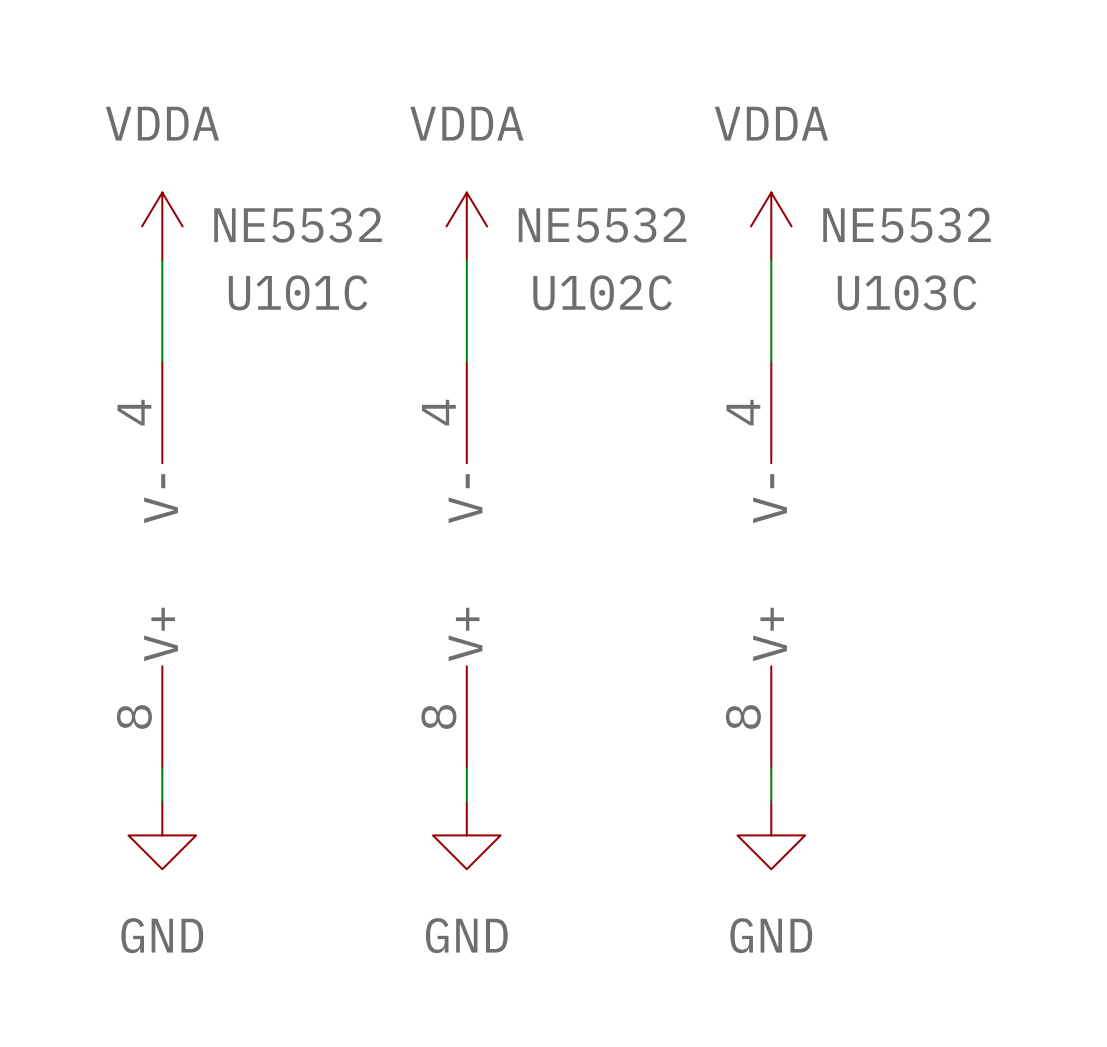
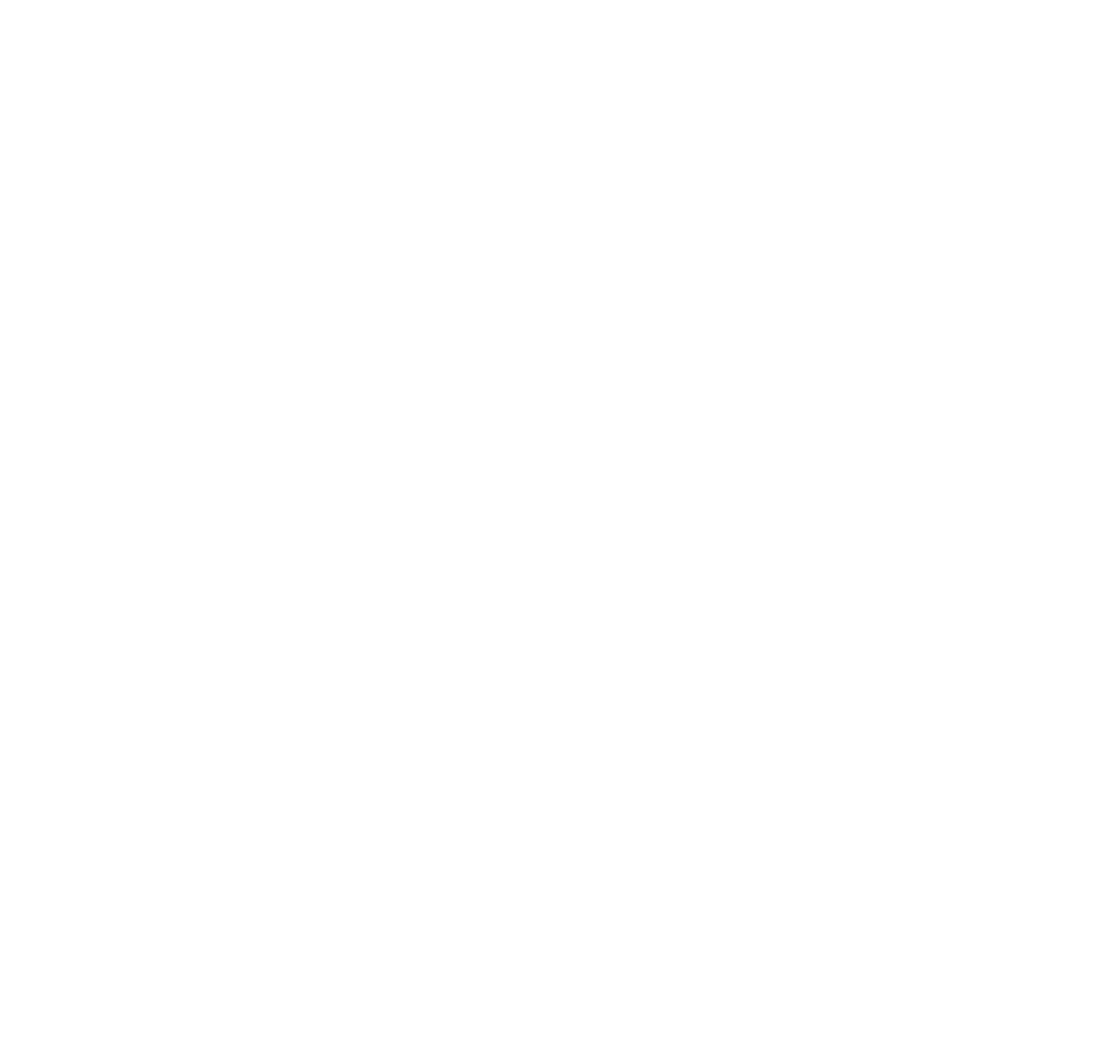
power symbol: VDDA (162, 226) -> none
power symbol: VDDA (466, 226) -> none
power symbol: VDDA (771, 226) -> none
wire: (162, 260) (162, 361) -> none
wire: (466, 260) (466, 361) -> none
wire: (771, 260) (771, 361) -> none
U101C: NE5532 (162, 564) -> none
U102C: NE5532 (466, 564) -> none
U103C: NE5532 (771, 564) -> none
wire: (162, 767) (162, 801) -> none
wire: (466, 767) (466, 801) -> none
wire: (771, 767) (771, 801) -> none
power symbol: GND (162, 835) -> none
power symbol: GND (466, 835) -> none
power symbol: GND (771, 835) -> none

